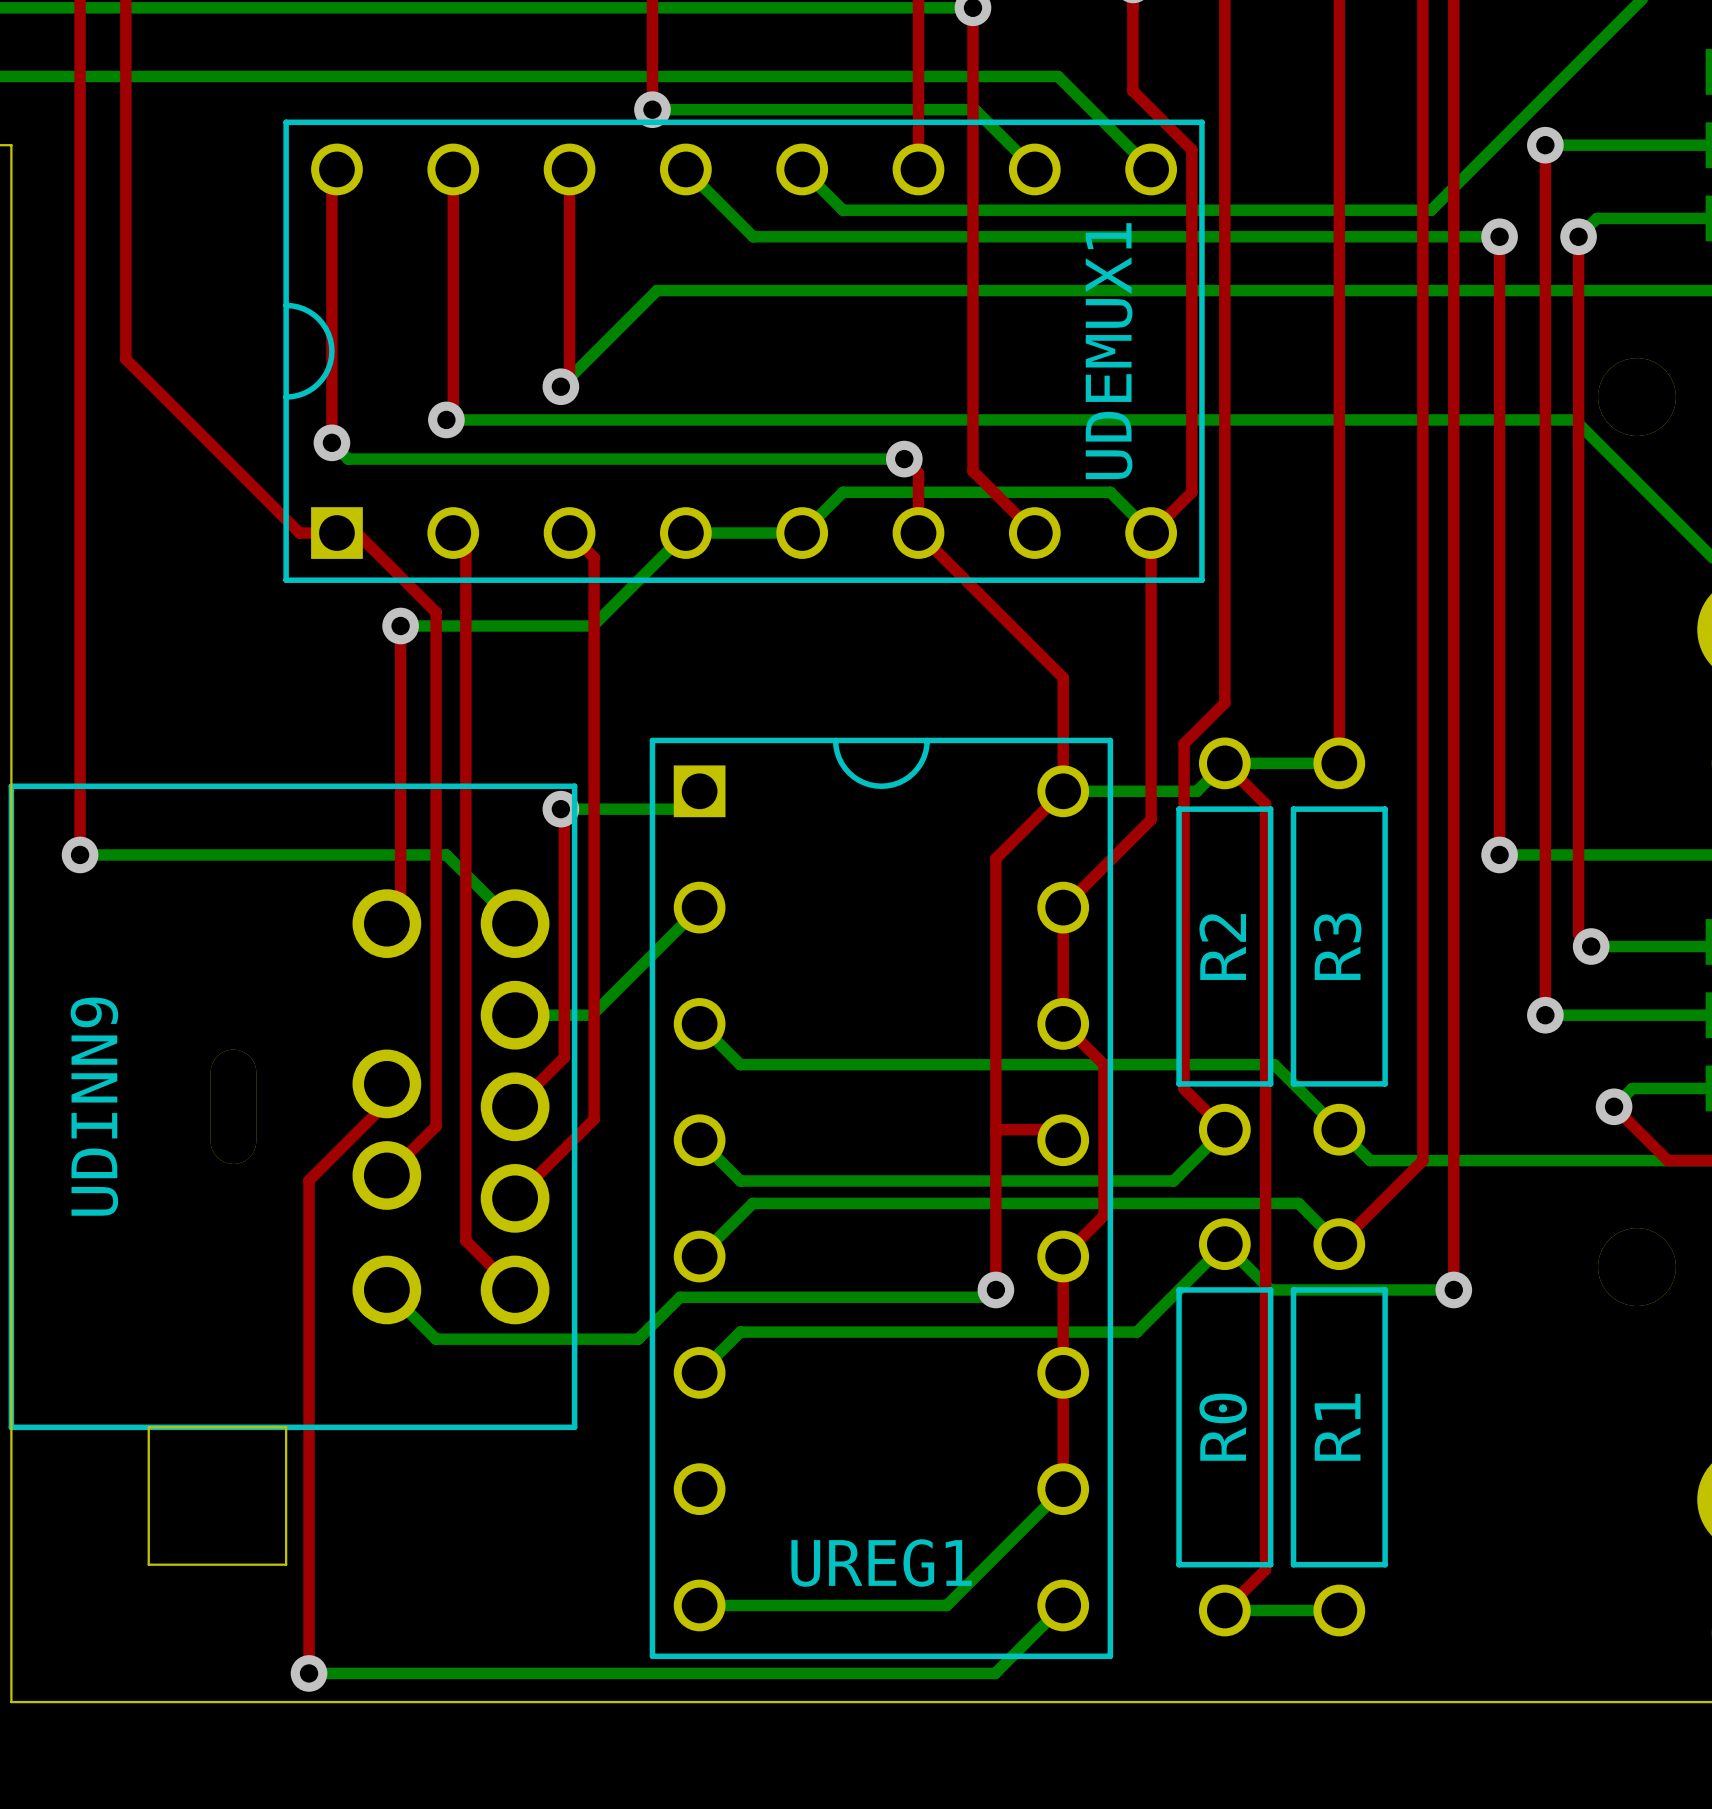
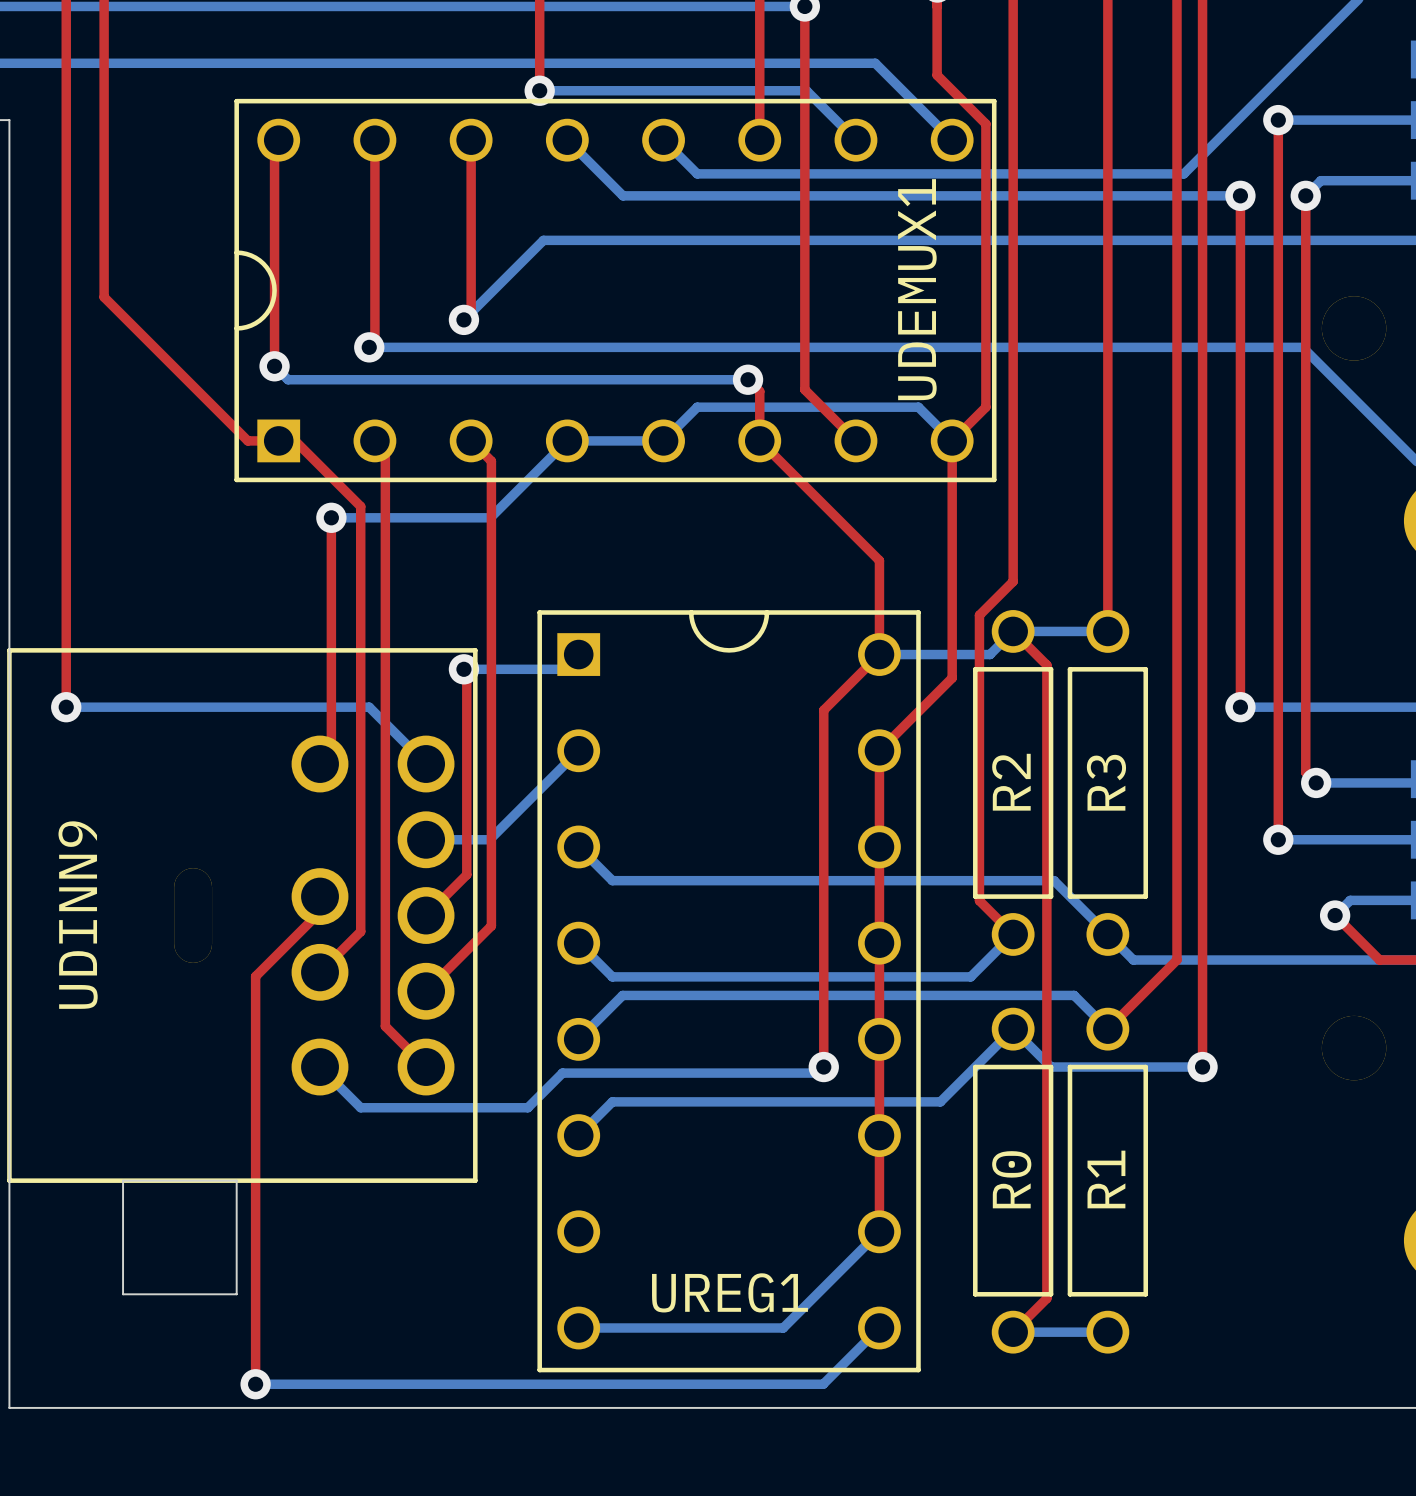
top track: (1063, 1023) (1103, 1064) (1103, 1215) (1063, 1256) -> (879, 846) (879, 1039)
top track: (995, 1129) (1052, 1129) (1063, 1140) -> none

